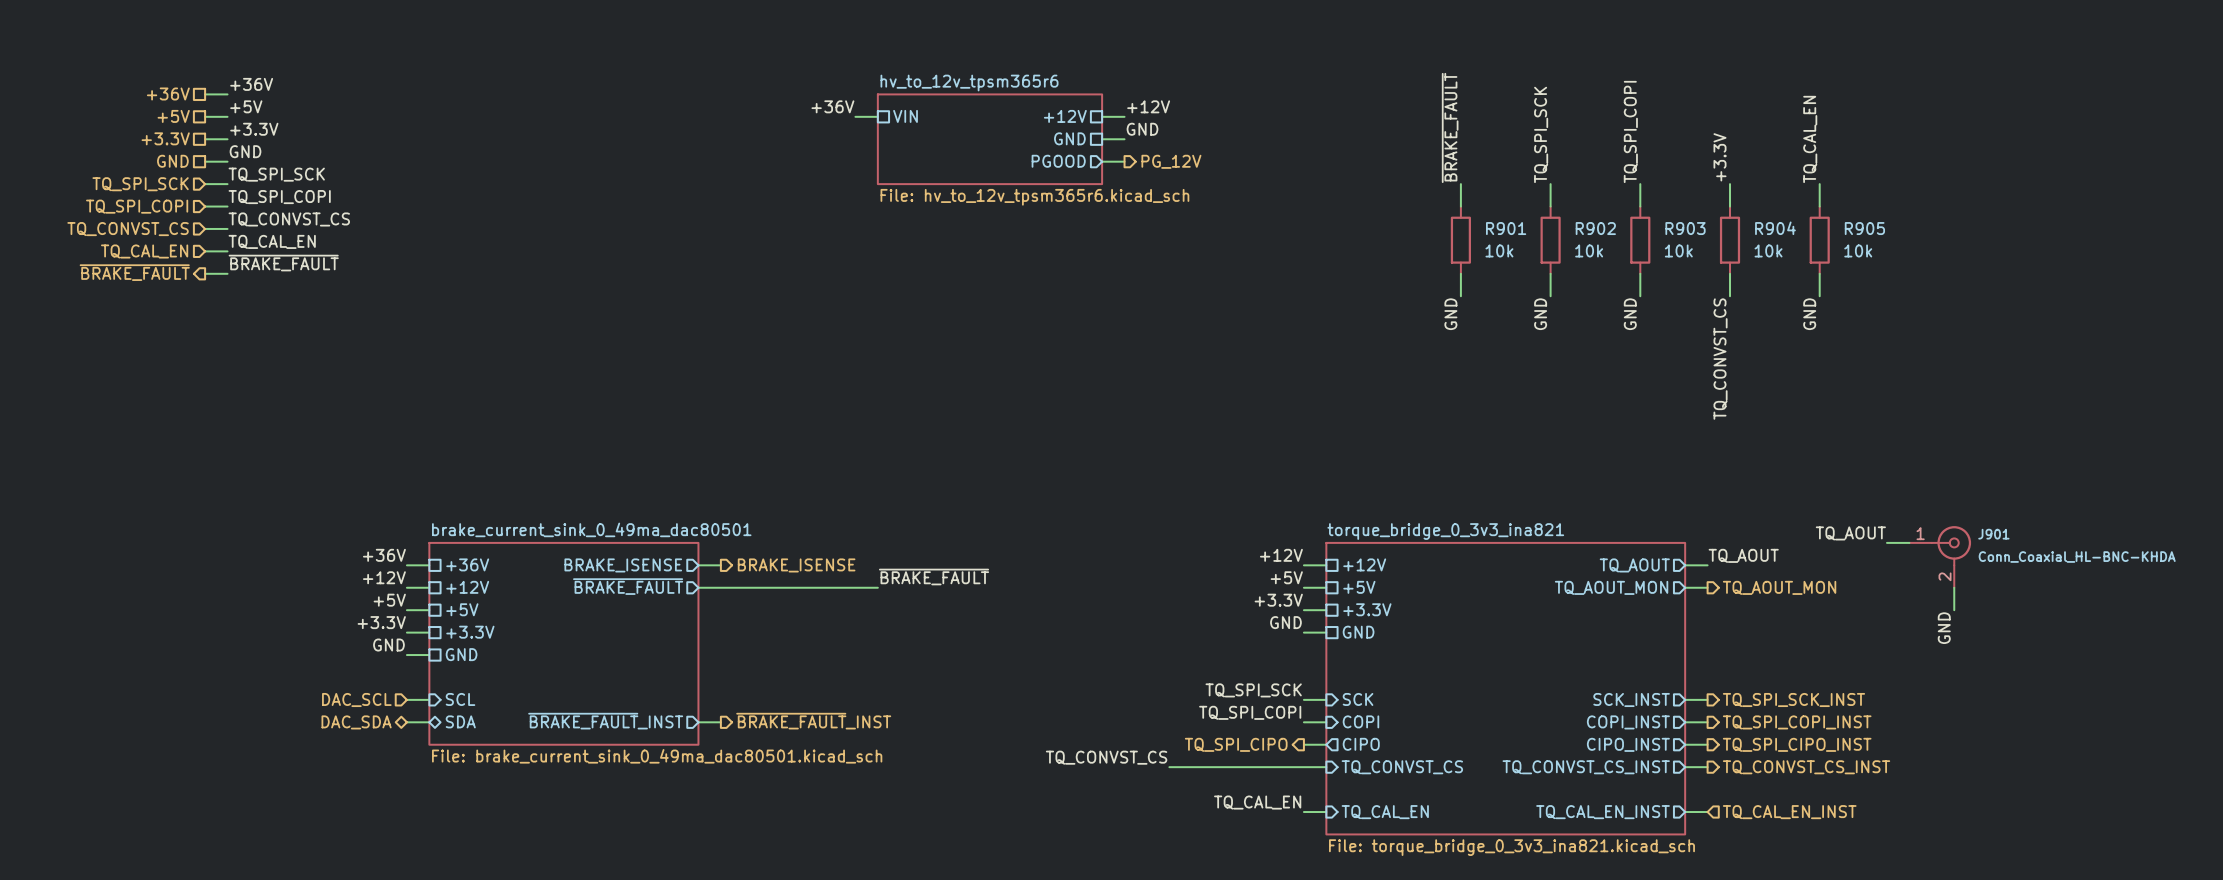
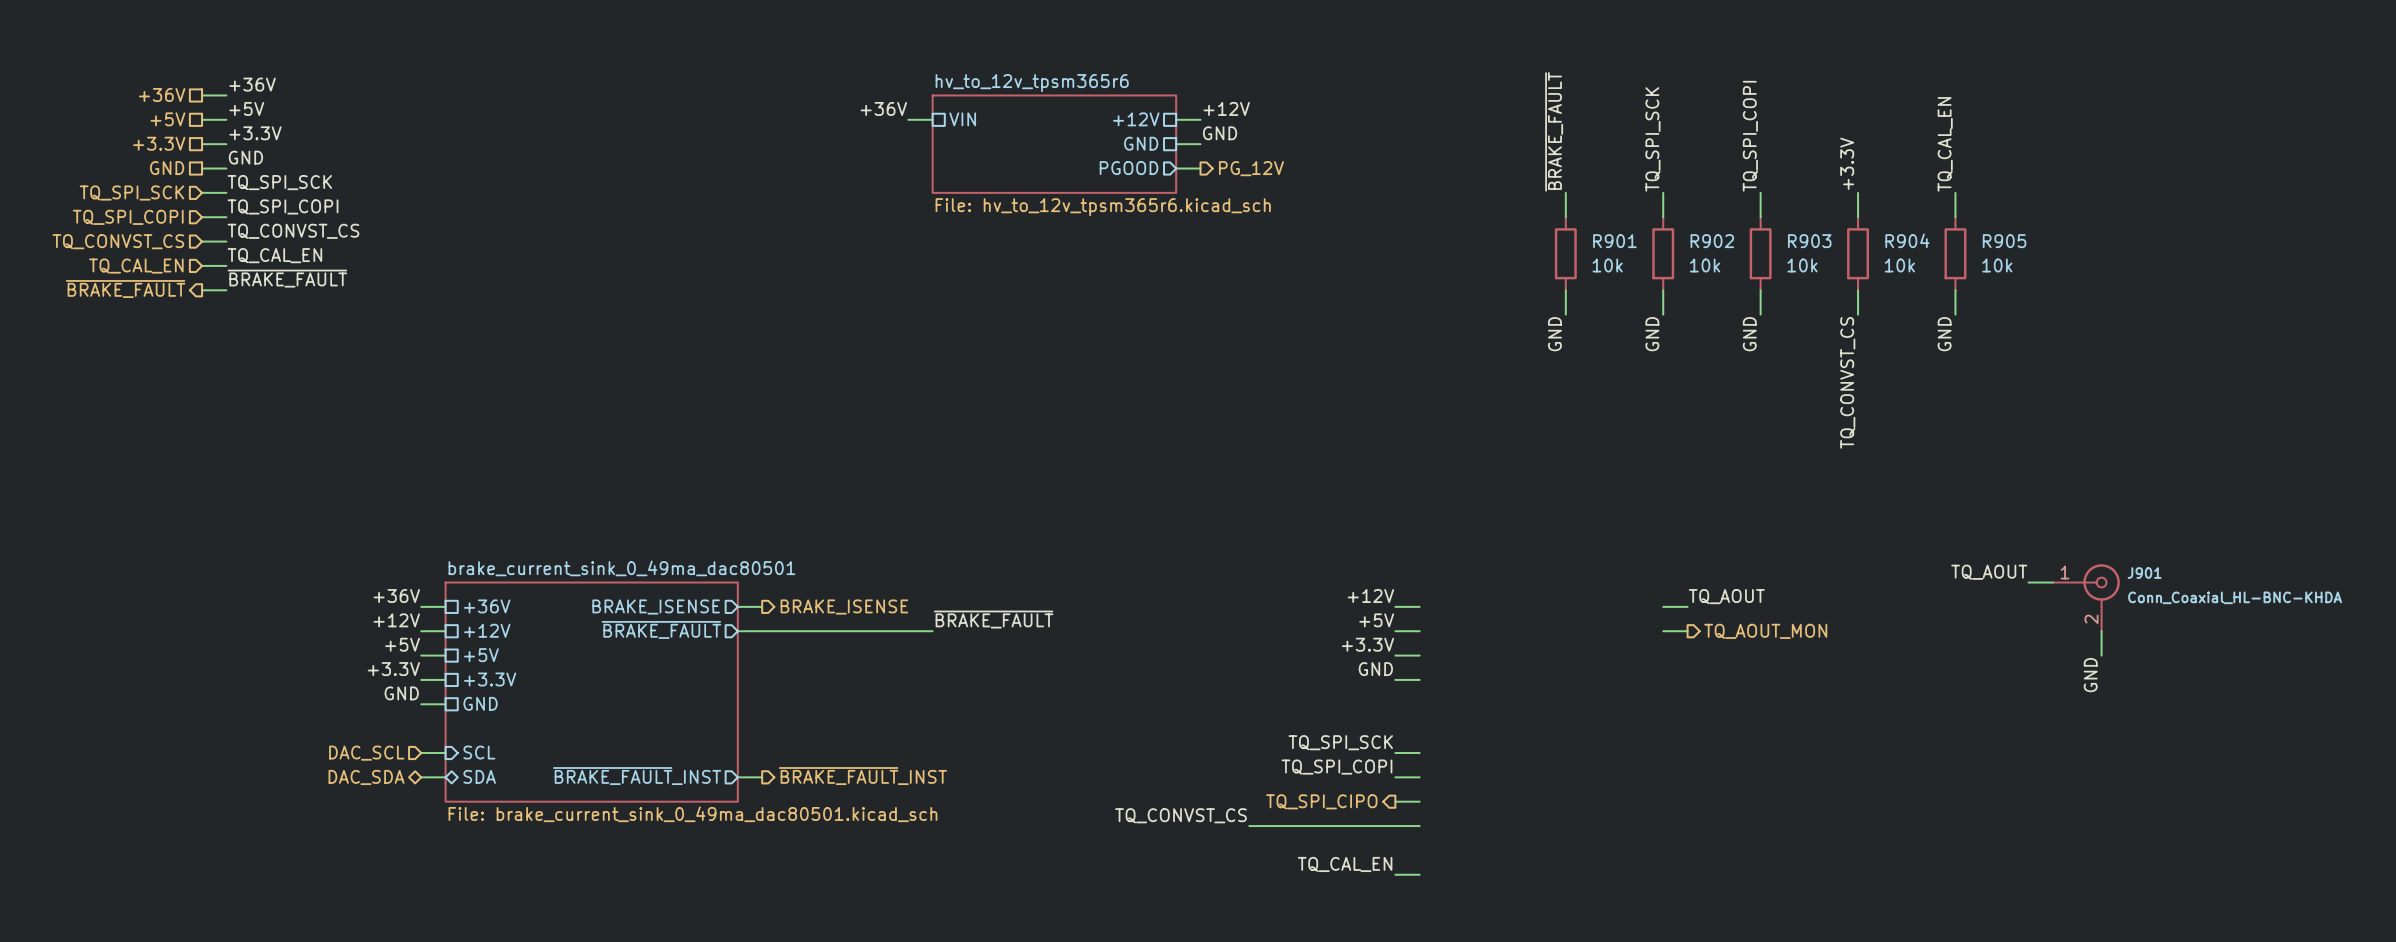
label position: TQ_AOUT (1743, 555) -> TQ_AOUT (1726, 596)
sheet pin: +12V (1364, 564) -> none
sheet pin: TQ_AOUT (1634, 565) -> none
wire: (1685, 565) (1707, 565) -> (1663, 606) (1687, 606)
sheet pin: +5V (1359, 587) -> none
sheet pin: TQ_AOUT_MON (1611, 587) -> none
wire: (1685, 587) (1707, 587) -> (1663, 631) (1687, 631)
hierarchical label position: TQ_AOUT_MON (1779, 587) -> TQ_AOUT_MON (1765, 631)
sheet pin: +3.3V (1367, 609) -> none
sheet pin: GND (1358, 632) -> none
sheet torque_bridge_0_3v3_ina821: File: torque_bridge_0_3v3_ina821.kicad_sch (1505, 688) -> none
sheet pin: SCK (1358, 699) -> none
wire: (1685, 699) (1707, 699) -> none
sheet pin: SCK_INST (1631, 700) -> none
hierarchical label: TQ_SPI_SCK_INST (1793, 700) -> none
sheet pin: COPI (1360, 721) -> none
sheet pin: COPI_INST (1628, 722) -> none
wire: (1685, 722) (1707, 722) -> none
hierarchical label: TQ_SPI_COPI_INST (1797, 722) -> none
sheet pin: CIPO (1361, 744) -> none
sheet pin: CIPO_INST (1628, 744) -> none
wire: (1685, 744) (1707, 744) -> none
hierarchical label: TQ_SPI_CIPO_INST (1797, 744) -> none
sheet pin: TQ_CONVST_CS (1402, 767) -> none
sheet pin: TQ_CONVST_CS_INST (1586, 767) -> none
wire: (1685, 767) (1707, 767) -> none
hierarchical label: TQ_CONVST_CS_INST (1806, 767) -> none
sheet pin: TQ_CAL_EN (1385, 812) -> none
sheet pin: TQ_CAL_EN_INST (1603, 812) -> none
wire: (1685, 812) (1707, 812) -> none
hierarchical label: TQ_CAL_EN_INST (1789, 812) -> none

